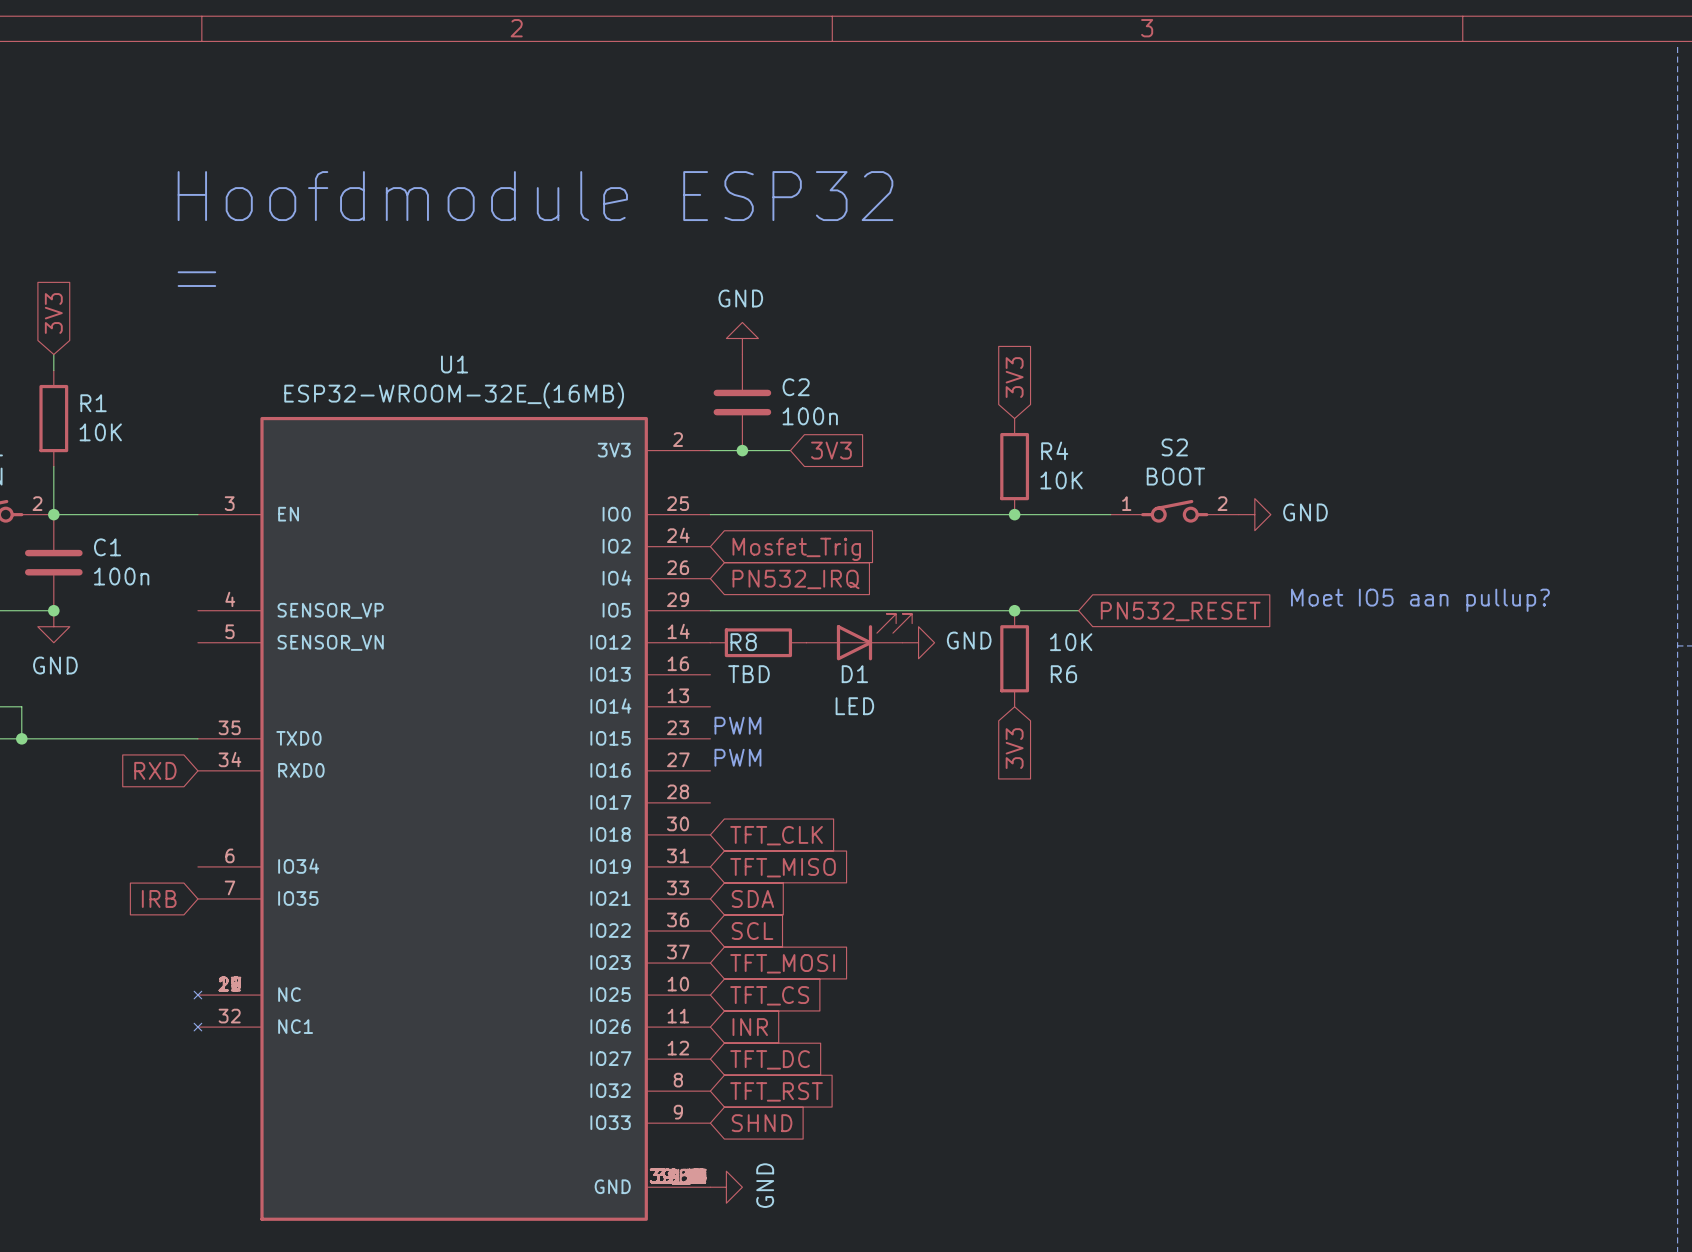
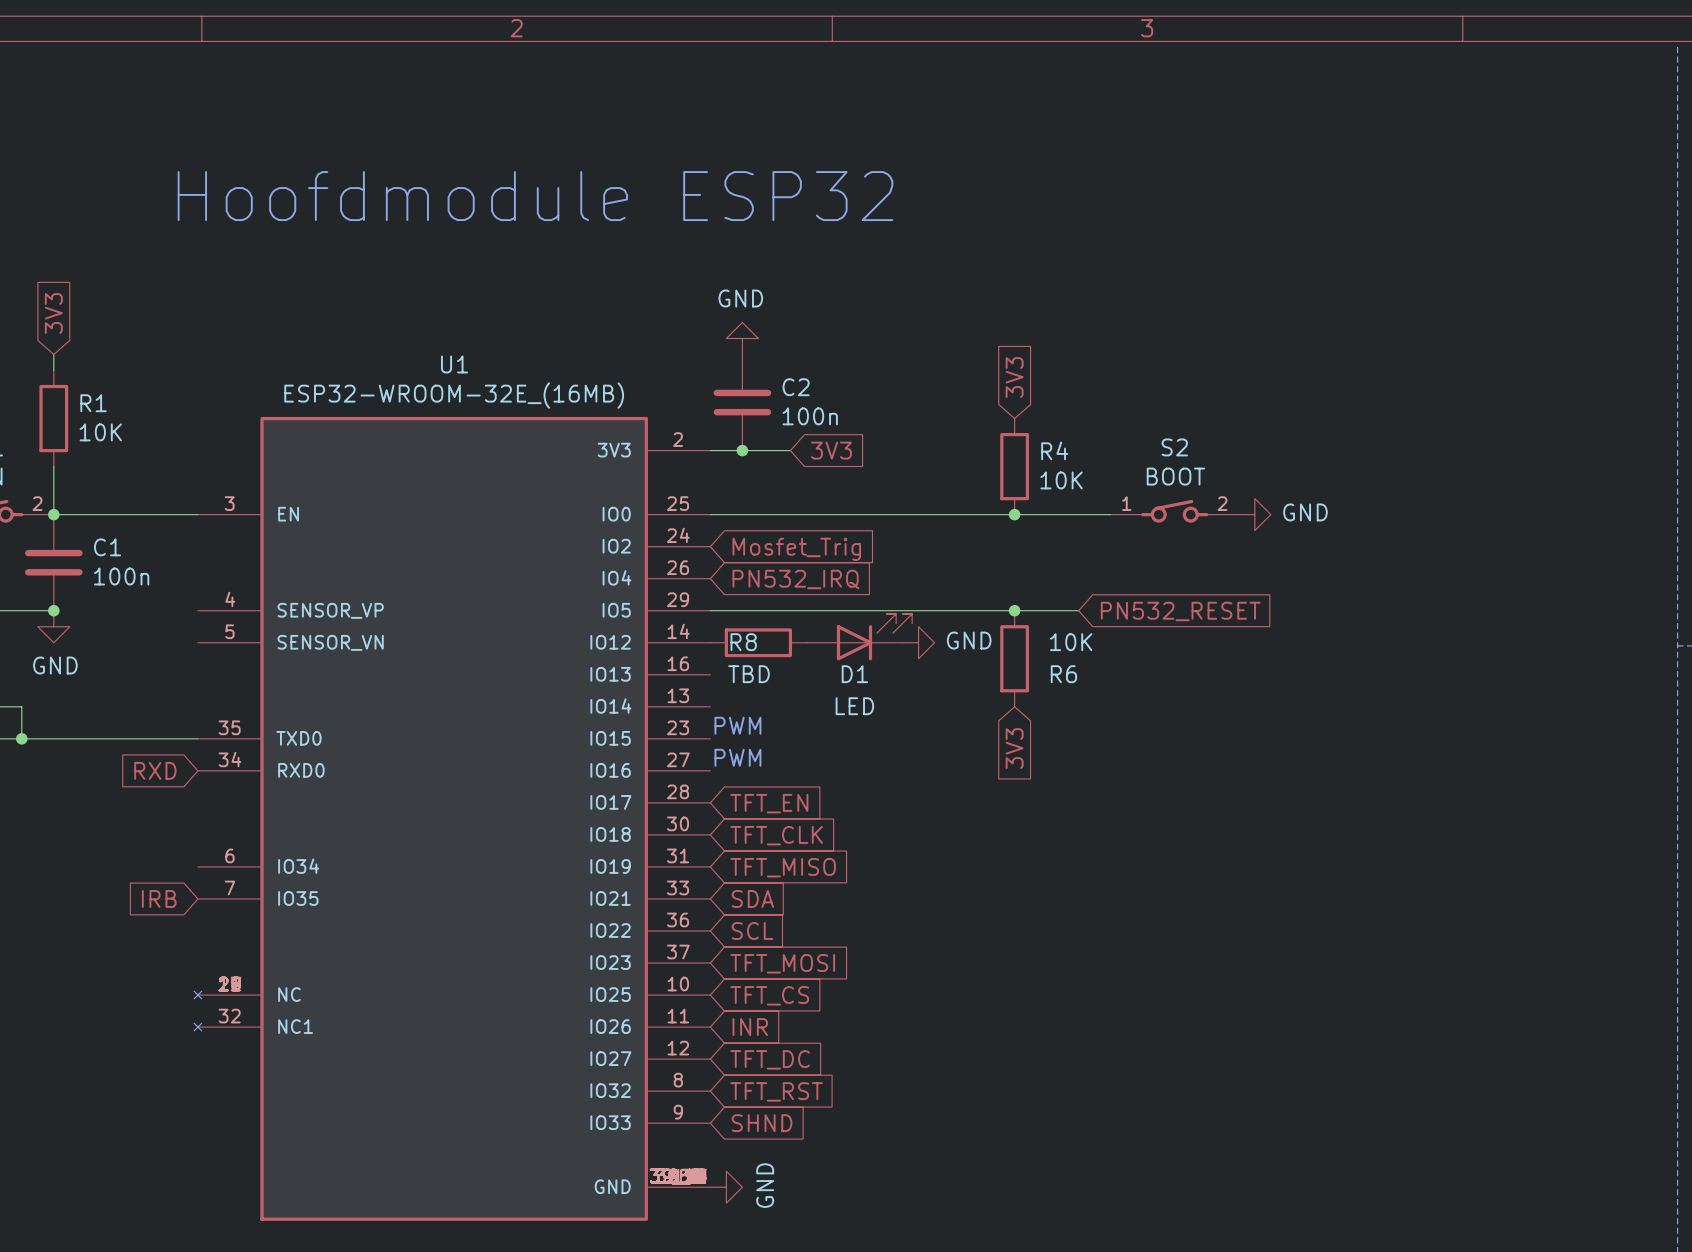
text: = (196, 279) -> none
text: Moet IO5 aan pullup? (1420, 600) -> none
global label: none -> TFT_EN (769, 803)

